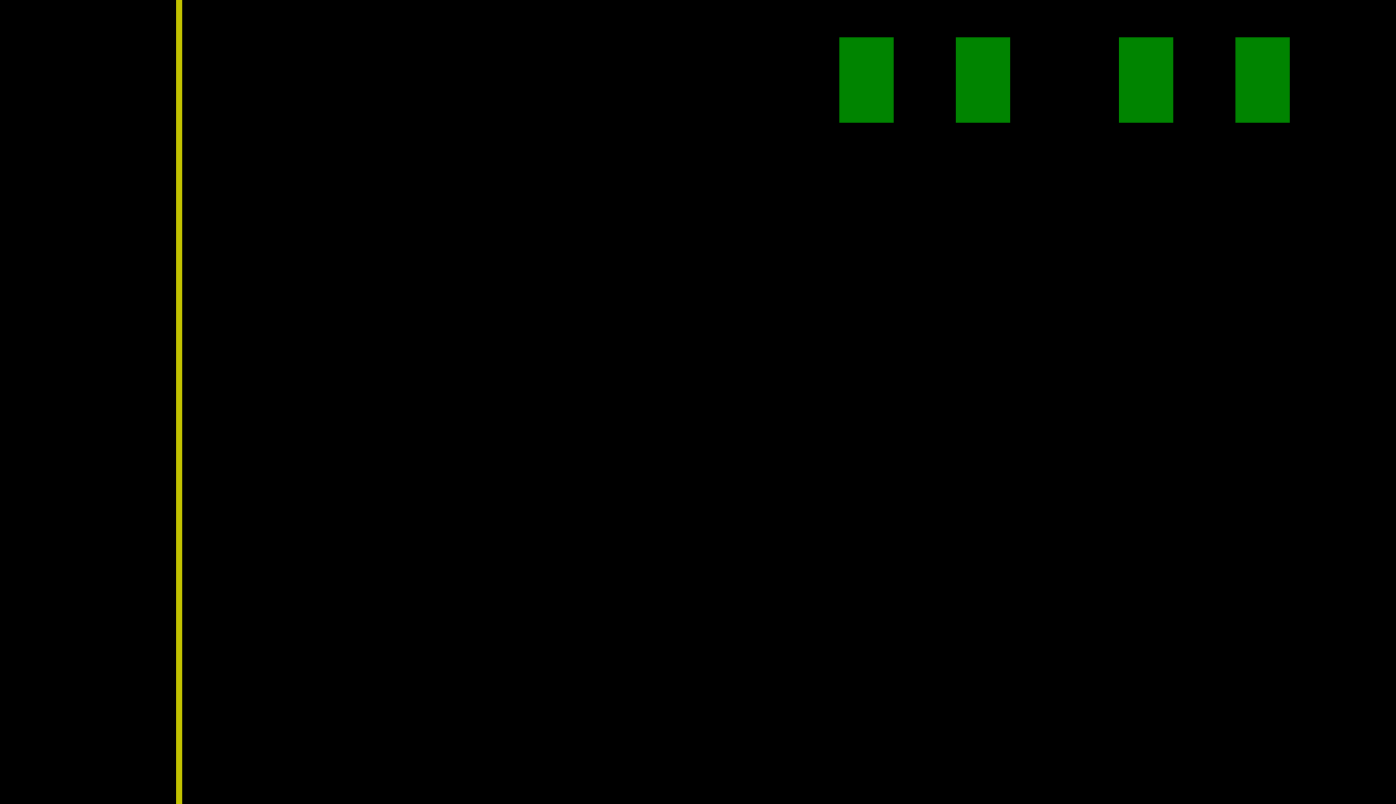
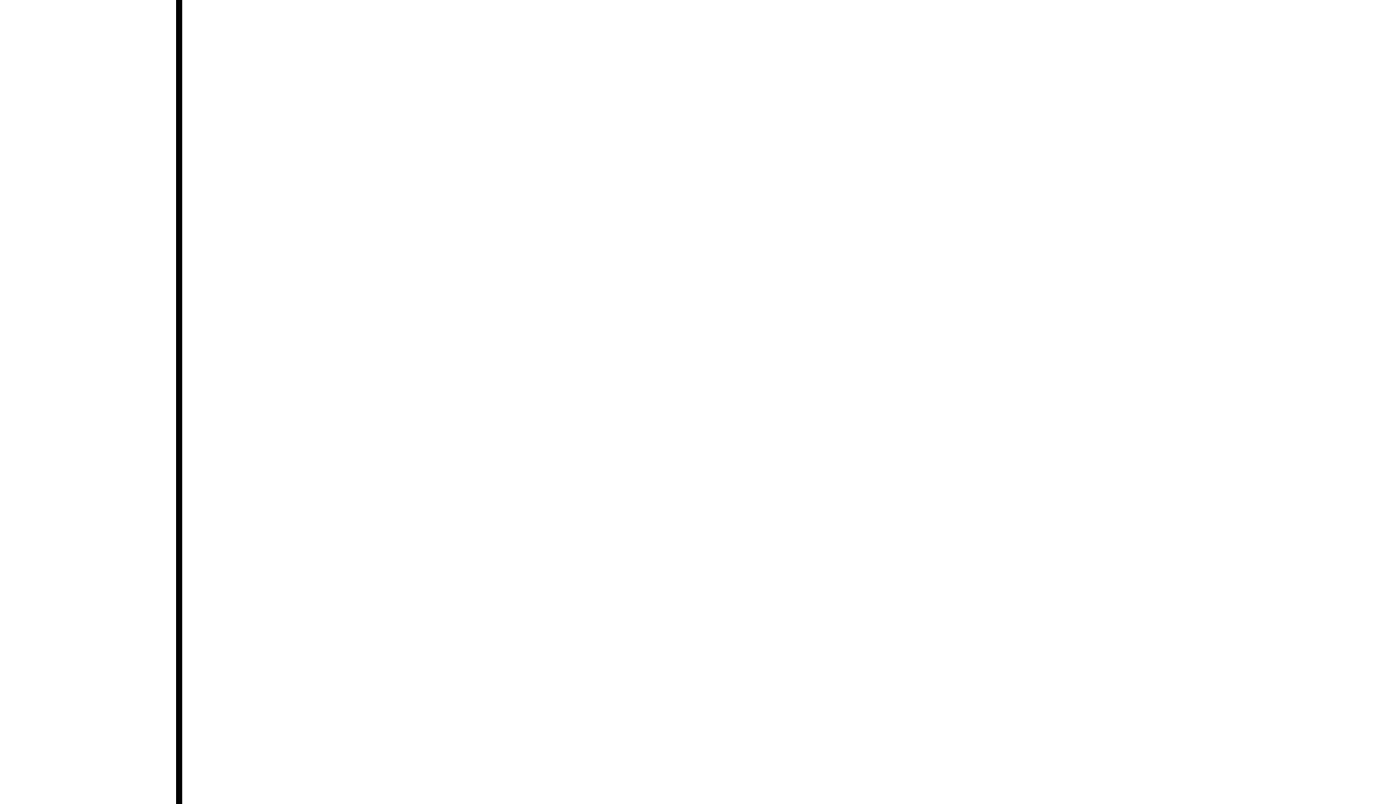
part: (924, 80) -> none
part: (1204, 80) -> none

